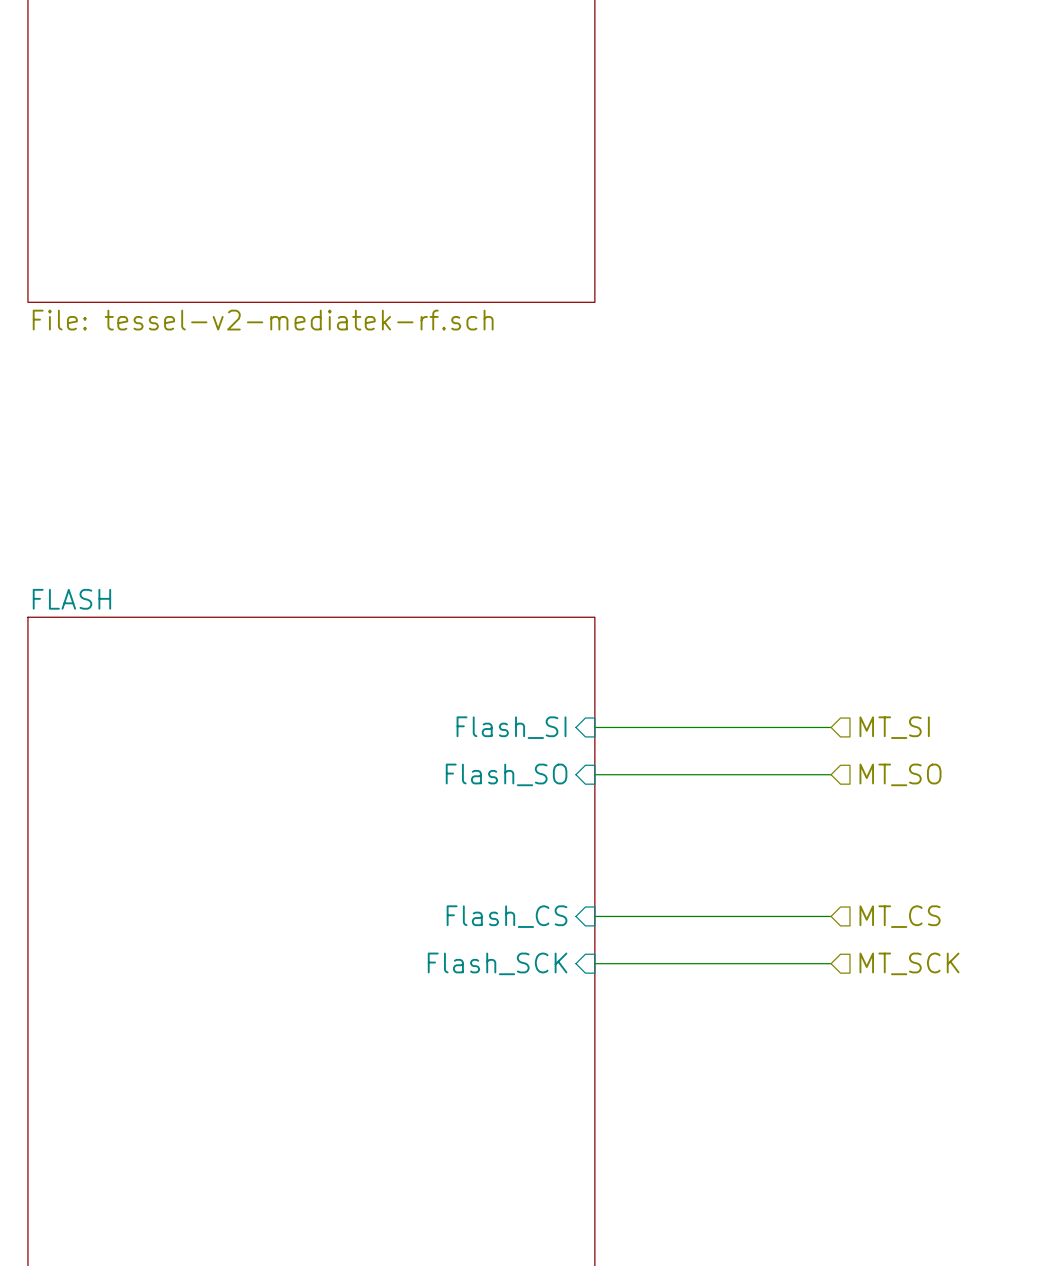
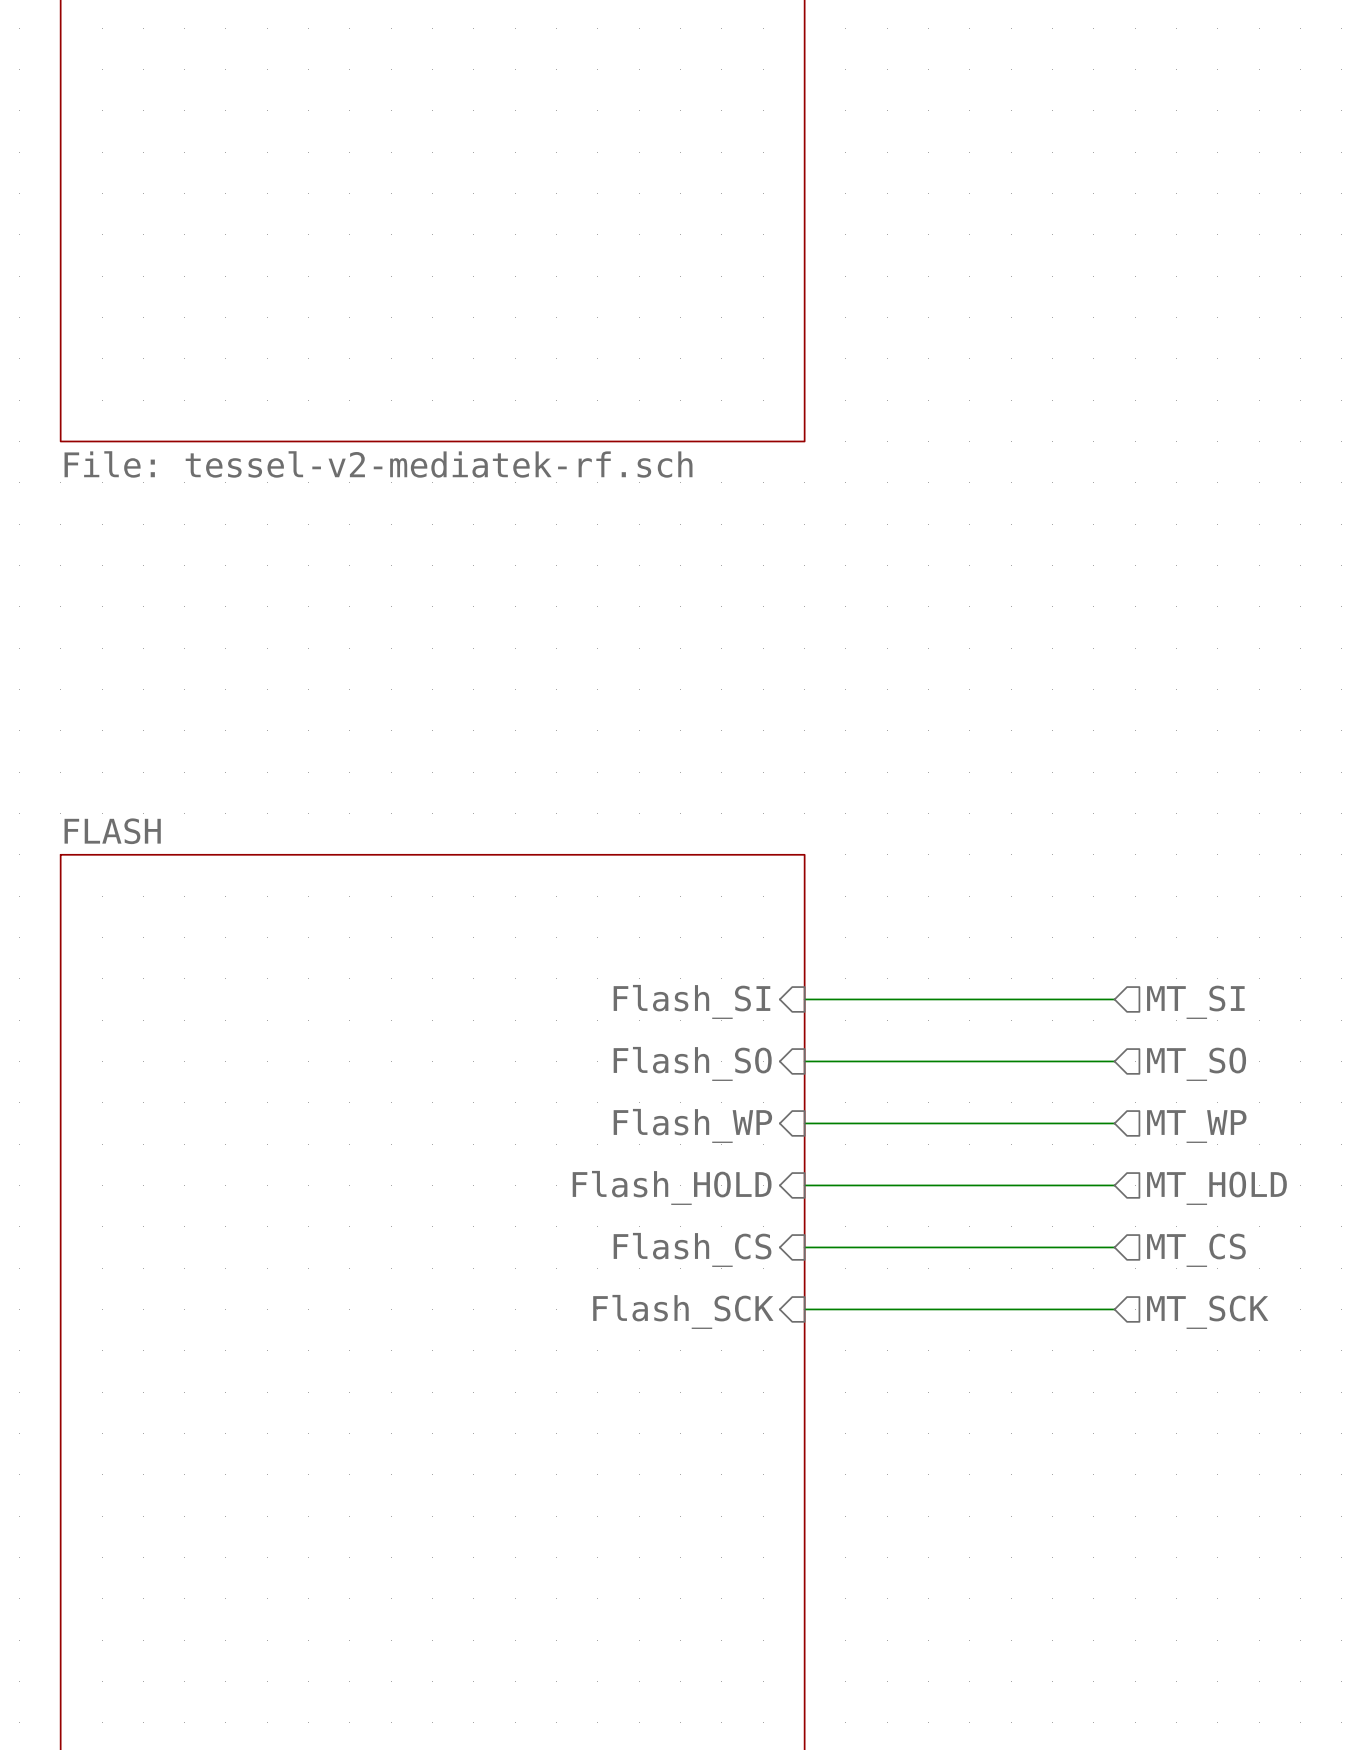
wire: none -> (804, 1123) (1114, 1123)
sheet pin: none -> Flash_WP (692, 1125)
hierarchical label: none -> MT_WP (1196, 1126)
sheet pin: none -> Flash_HOLD (672, 1187)
wire: none -> (804, 1185) (1114, 1185)
hierarchical label: none -> MT_HOLD (1216, 1188)

